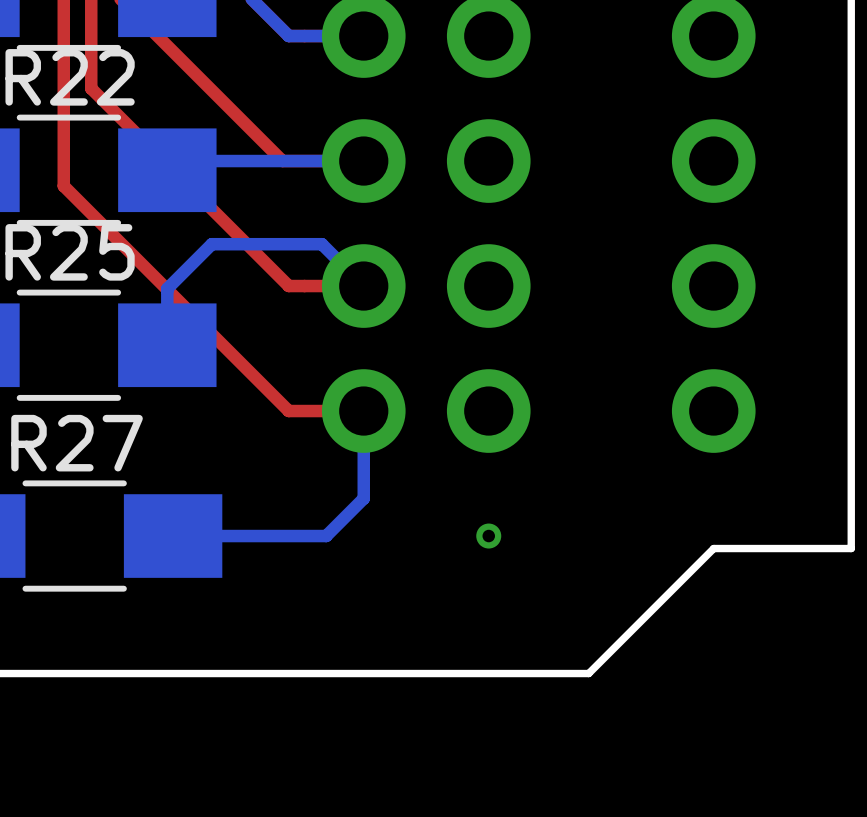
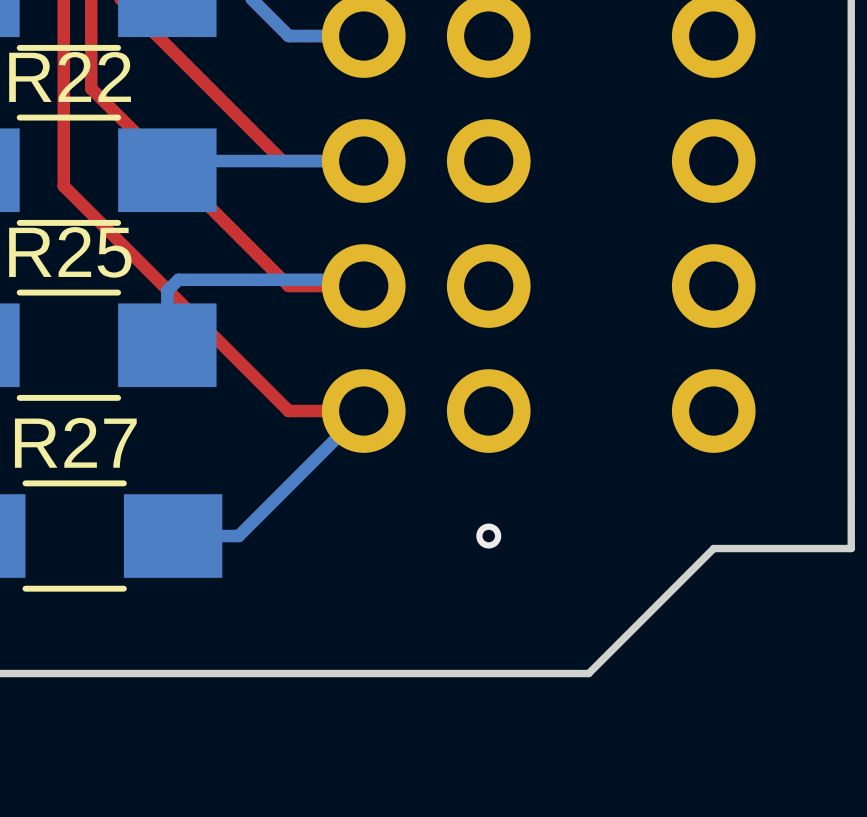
bottom track: (357, 279) (321, 244) (211, 244) (167, 288) (167, 290) -> (357, 279) (178, 279) (167, 290)
bottom track: (363, 411) (363, 498) (326, 536) (238, 536) -> (363, 411) (238, 536)

